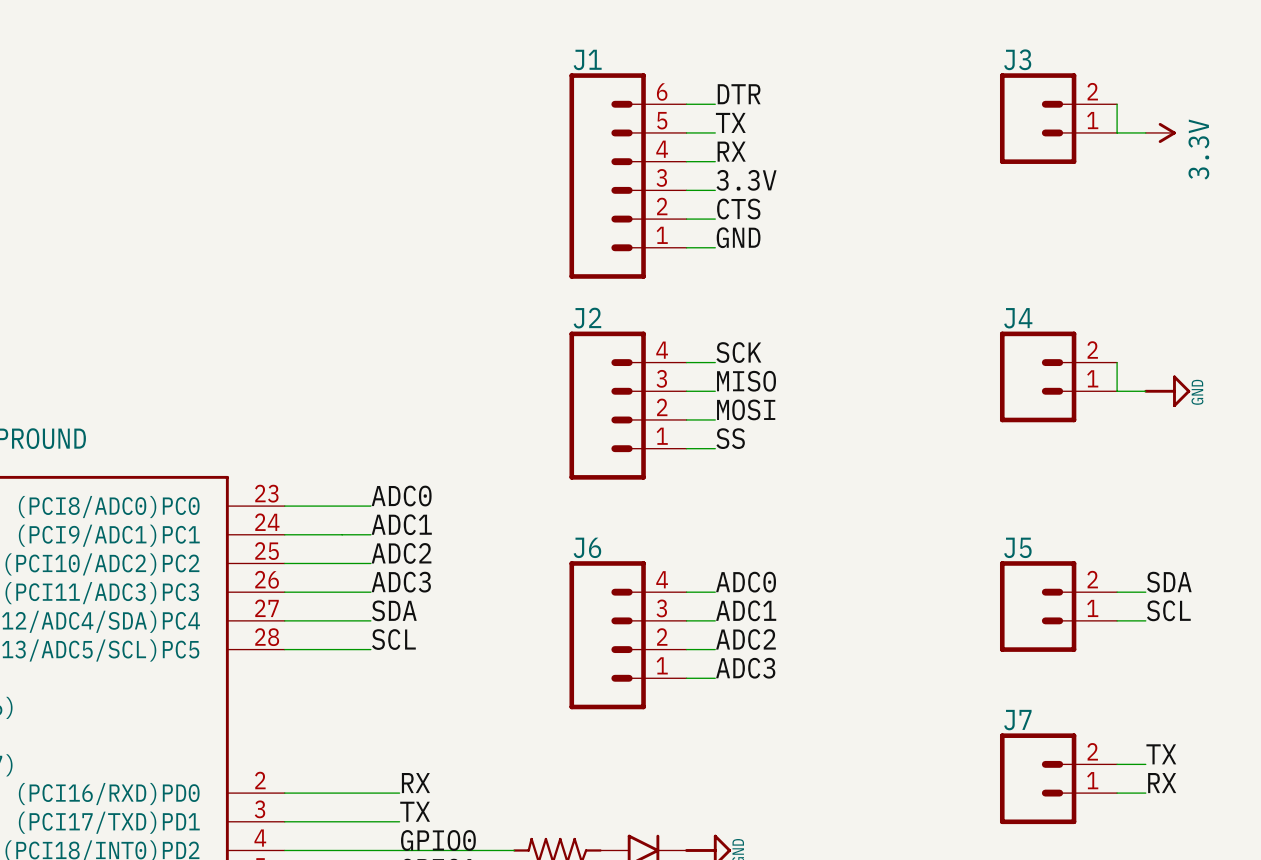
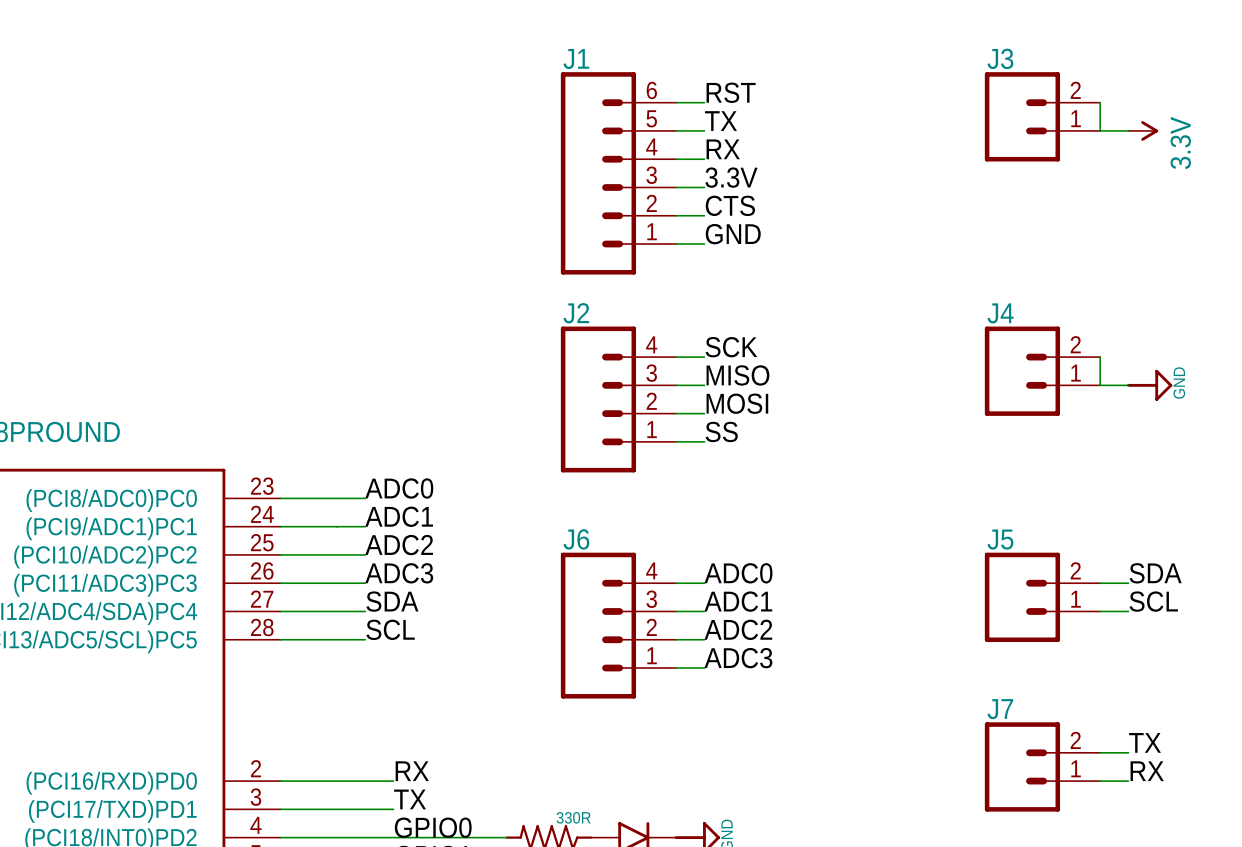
label: DTR (739, 94) -> RST (731, 92)
part value: none -> 330R (573, 817)

